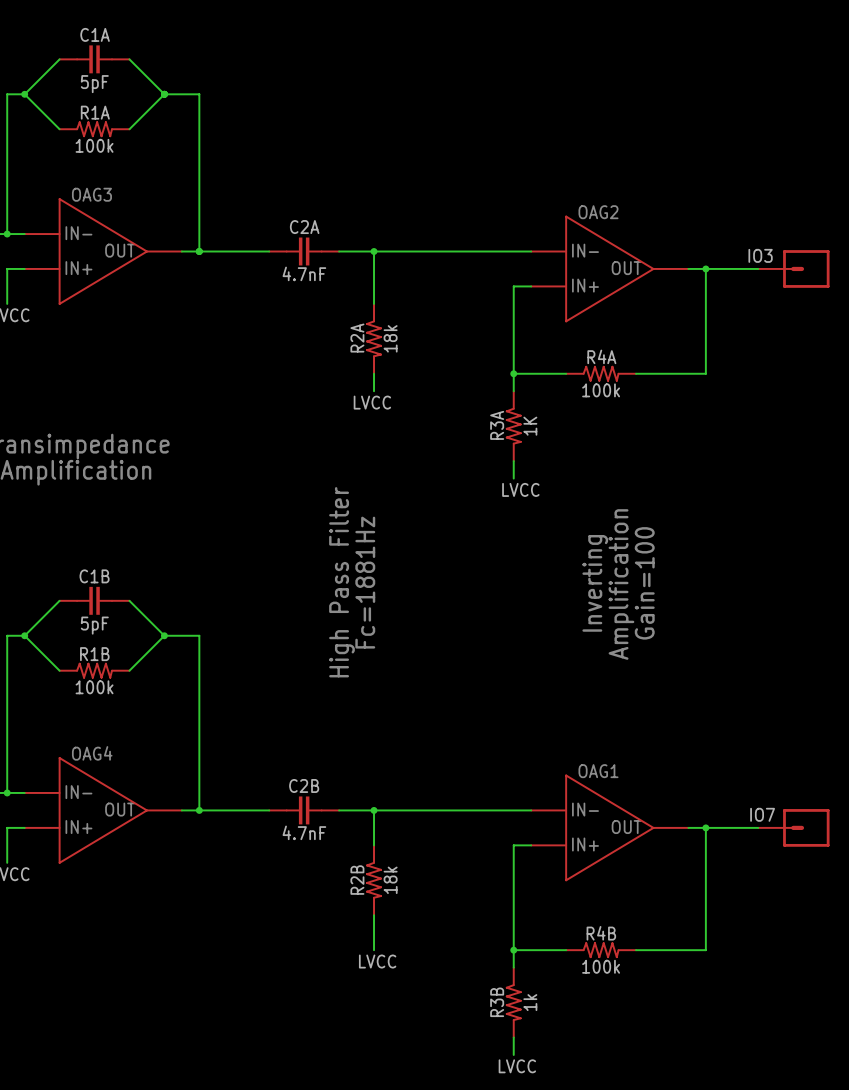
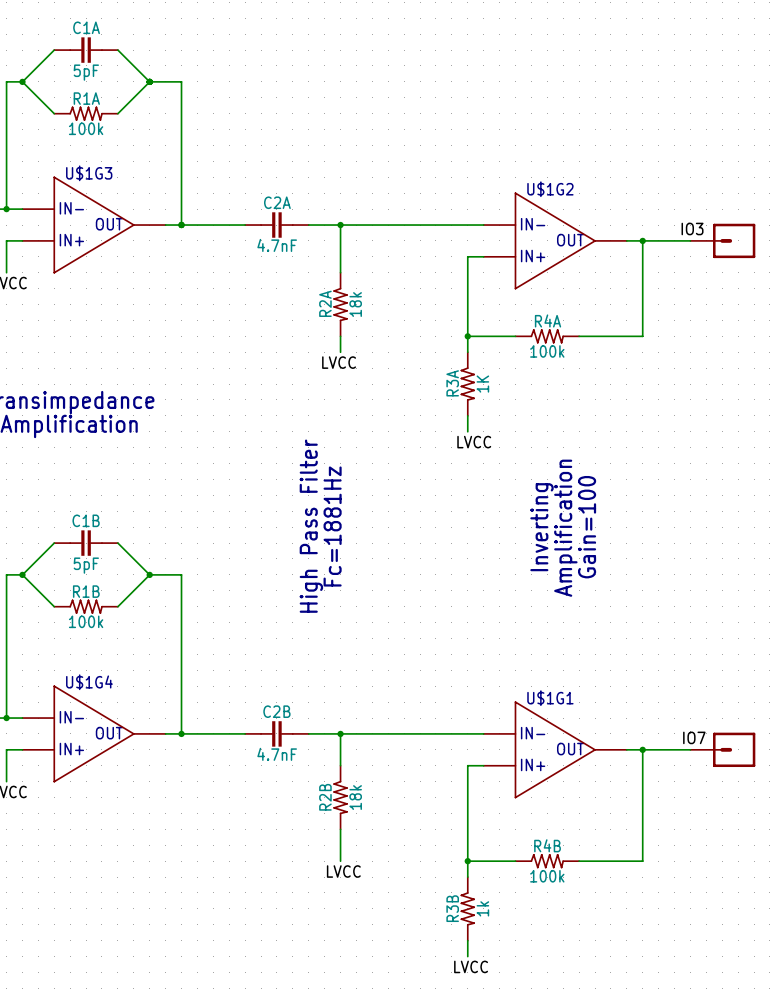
OAG3 name: OAG3 (91, 194) -> U$1G3 (89, 173)
OAG2 name: OAG2 (598, 212) -> U$1G2 (550, 189)
OAG4 name: OAG4 (92, 753) -> U$1G4 (89, 682)
OAG1 name: OAG1 (598, 771) -> U$1G1 (550, 698)

